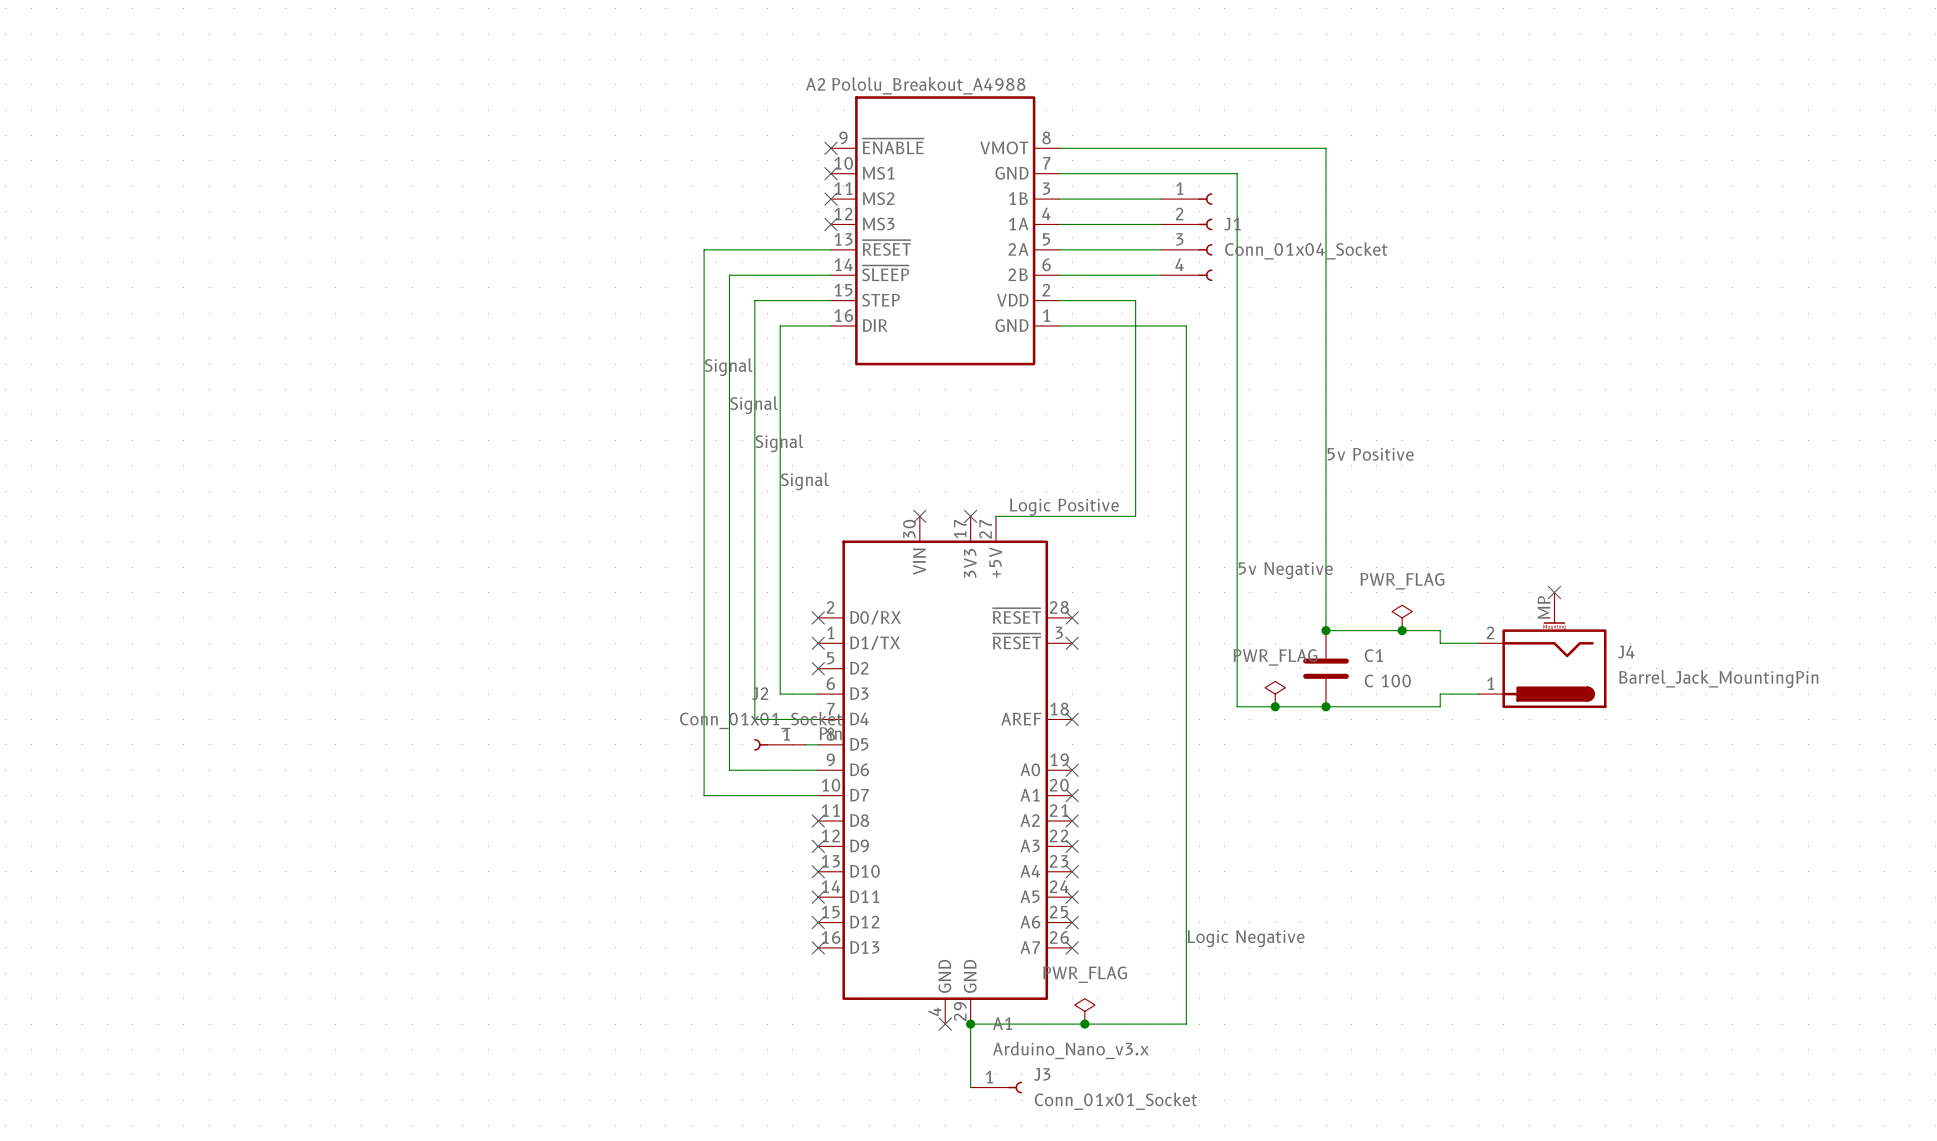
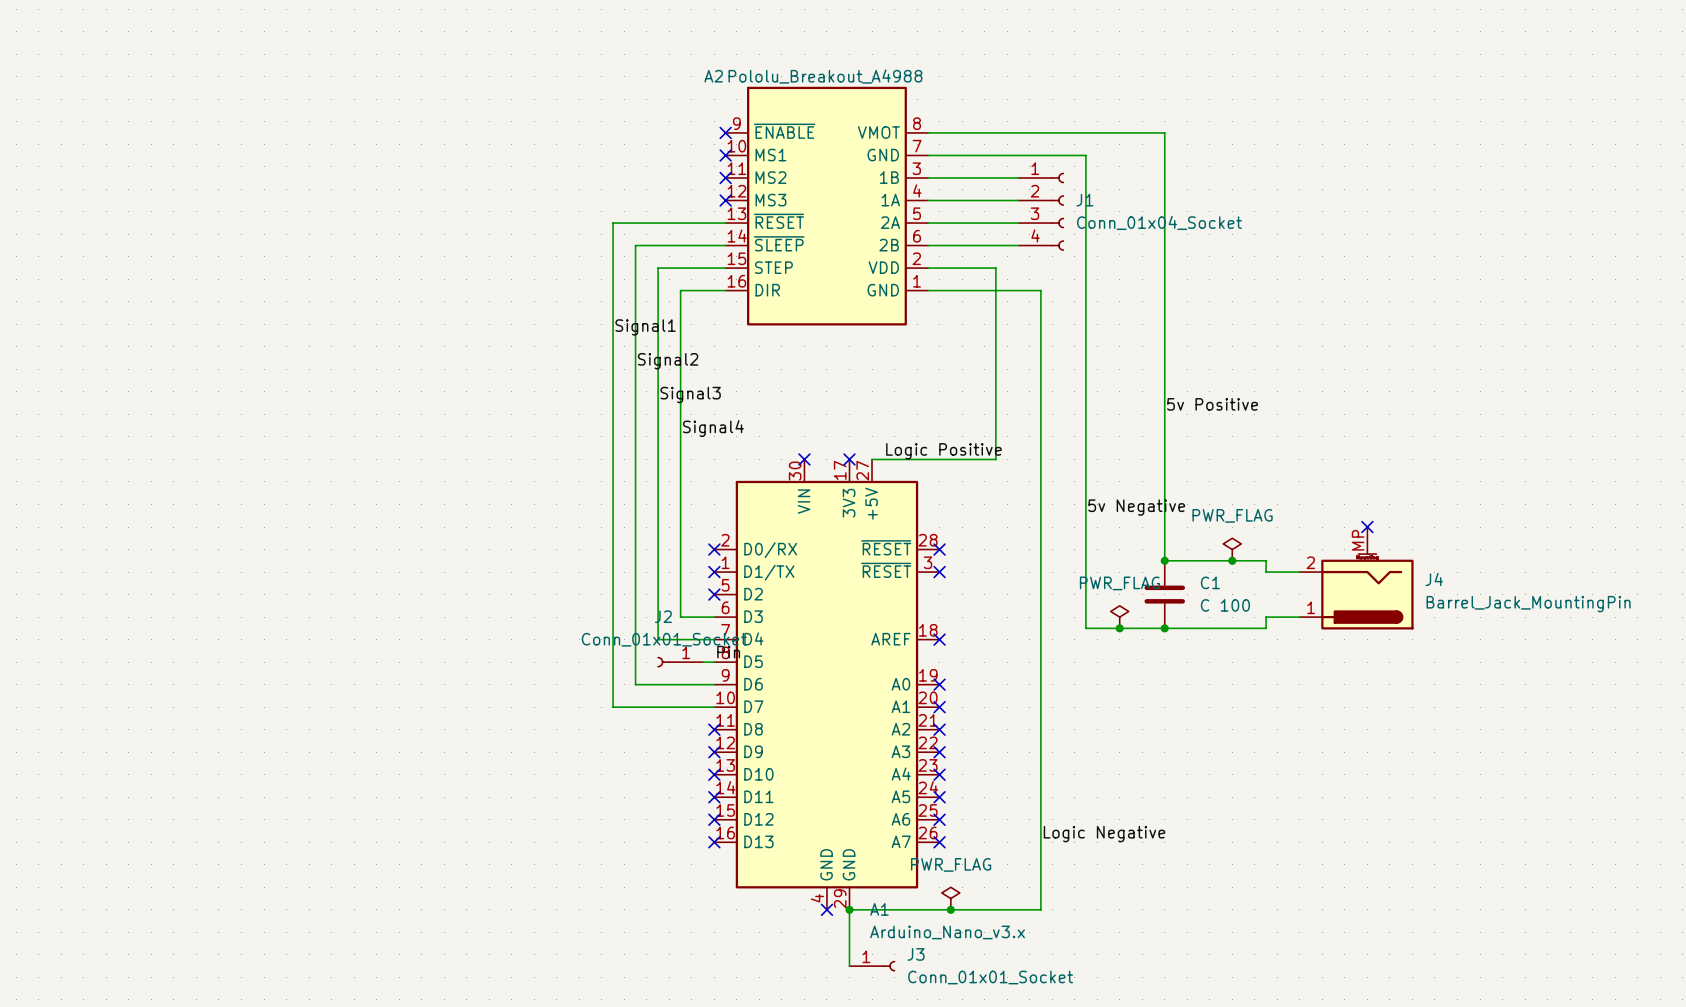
label: Signal (728, 367) -> Signal1 (645, 327)
label: Signal (754, 405) -> Signal2 (668, 361)
label: Signal (779, 443) -> Signal3 (690, 395)
label: Signal (804, 481) -> Signal4 (713, 428)

